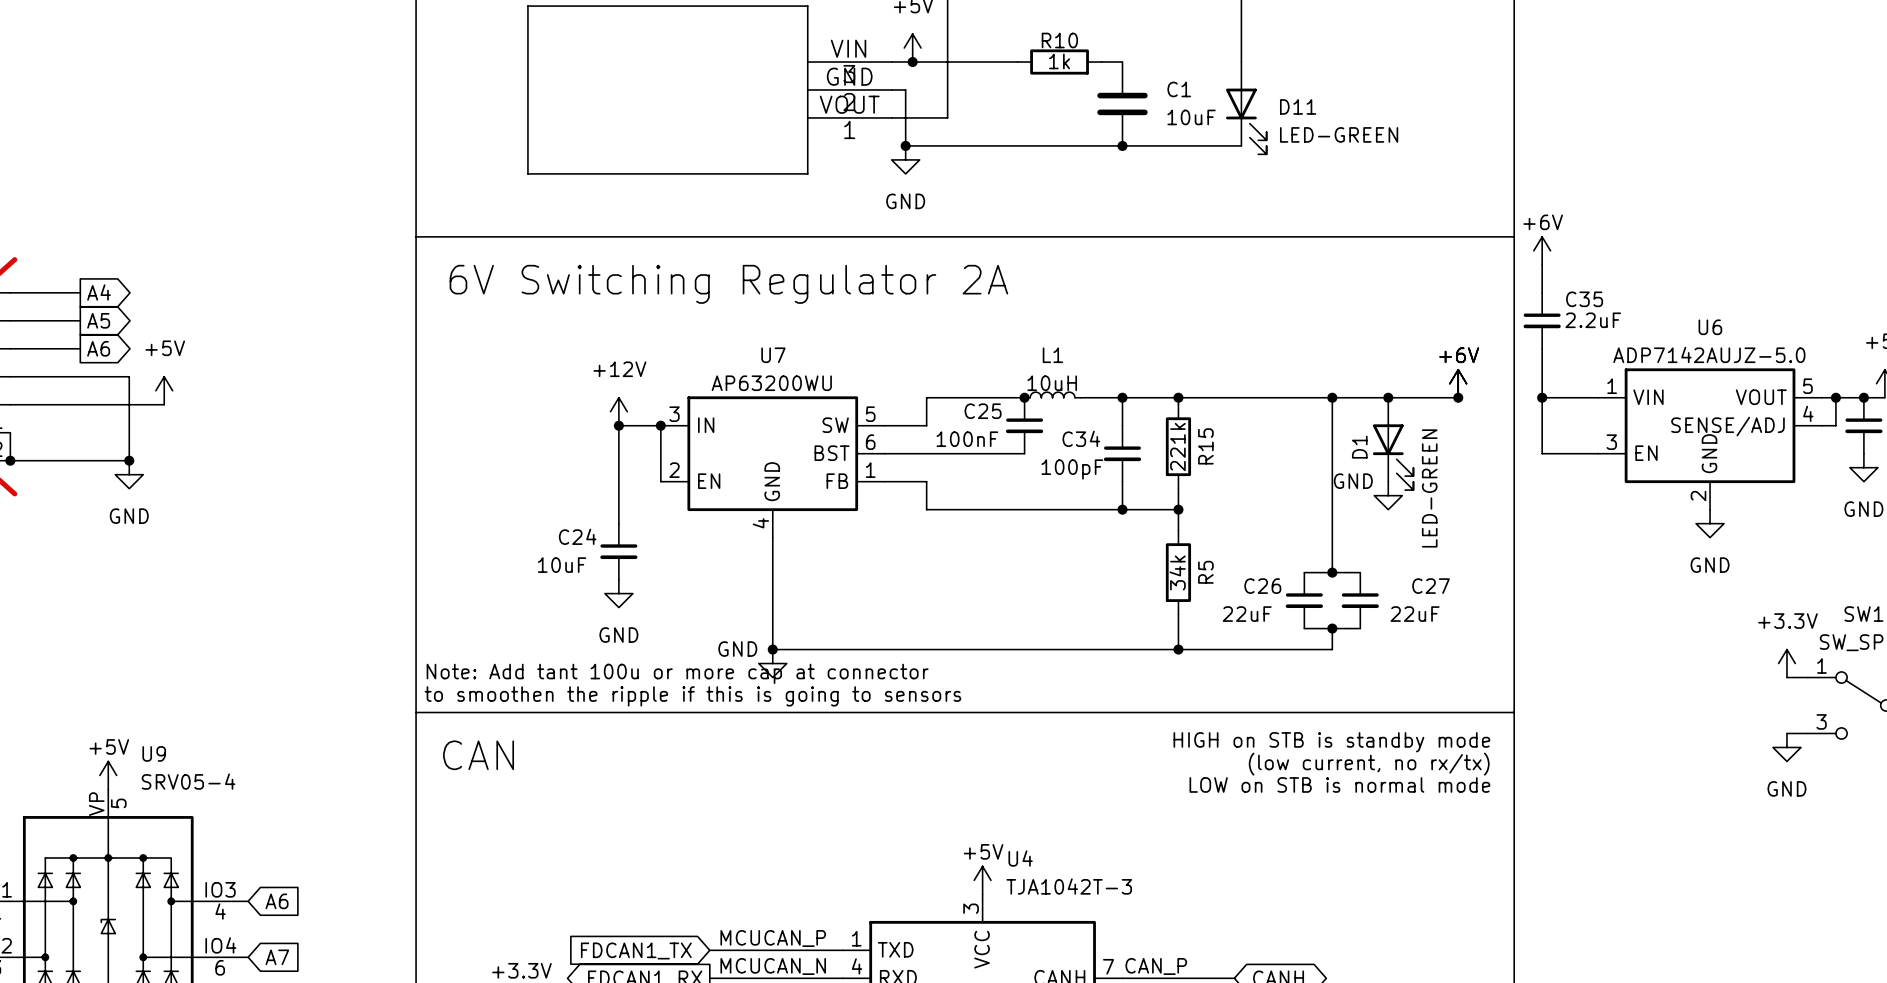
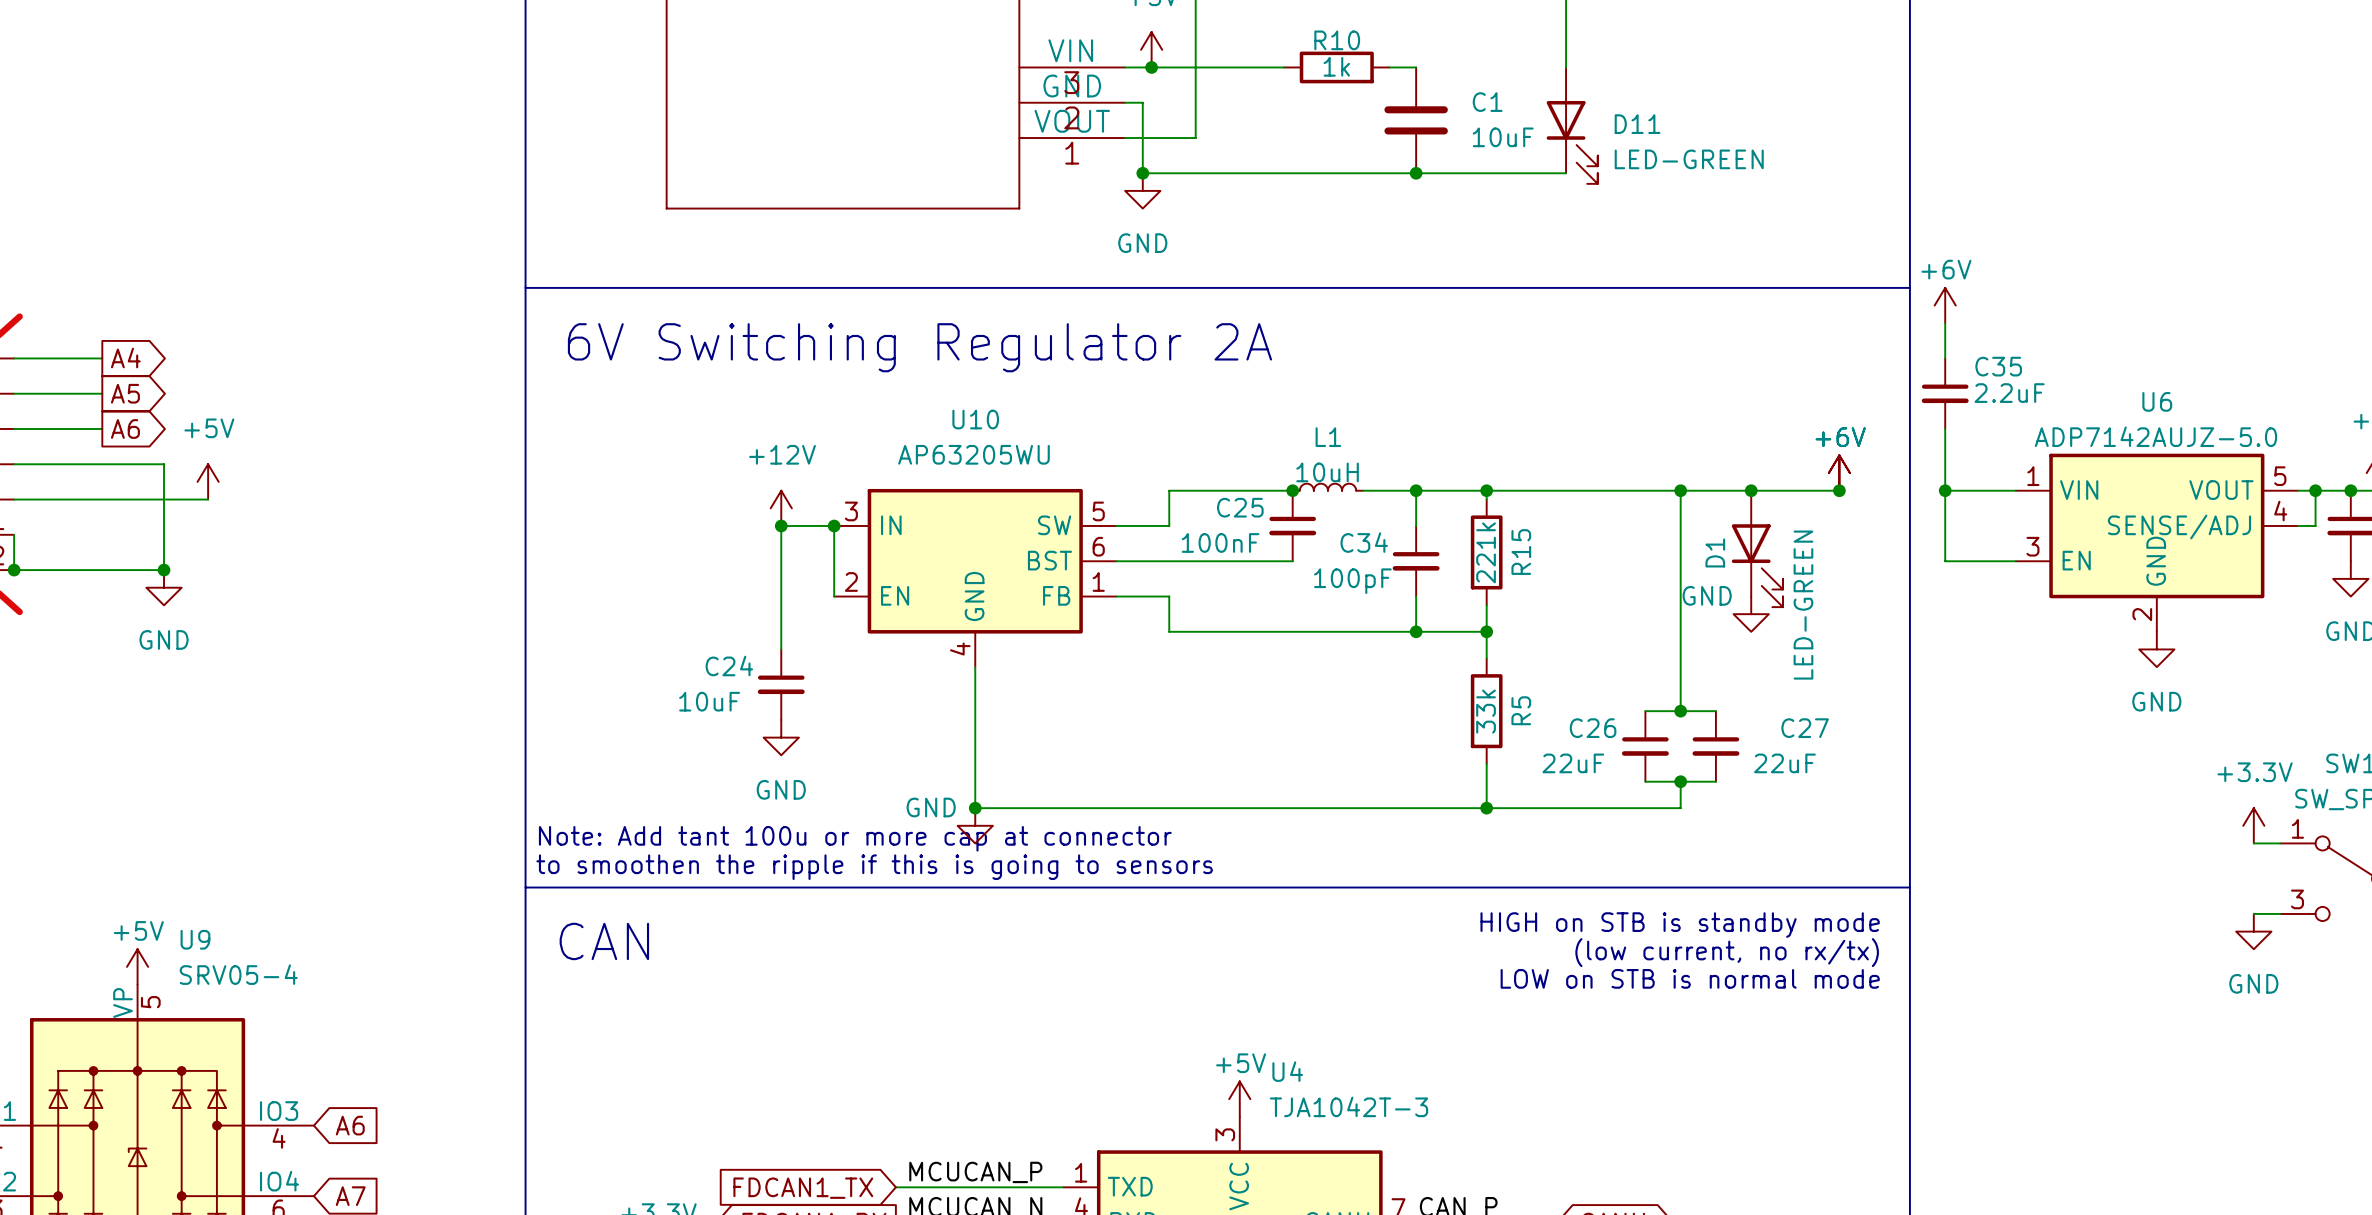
U7 name: U7 (773, 355) -> U10 (975, 419)
U7 value: AP63200WU (771, 383) -> AP63205WU (974, 454)
R5 value: 34k (1177, 572) -> 33k (1486, 711)

